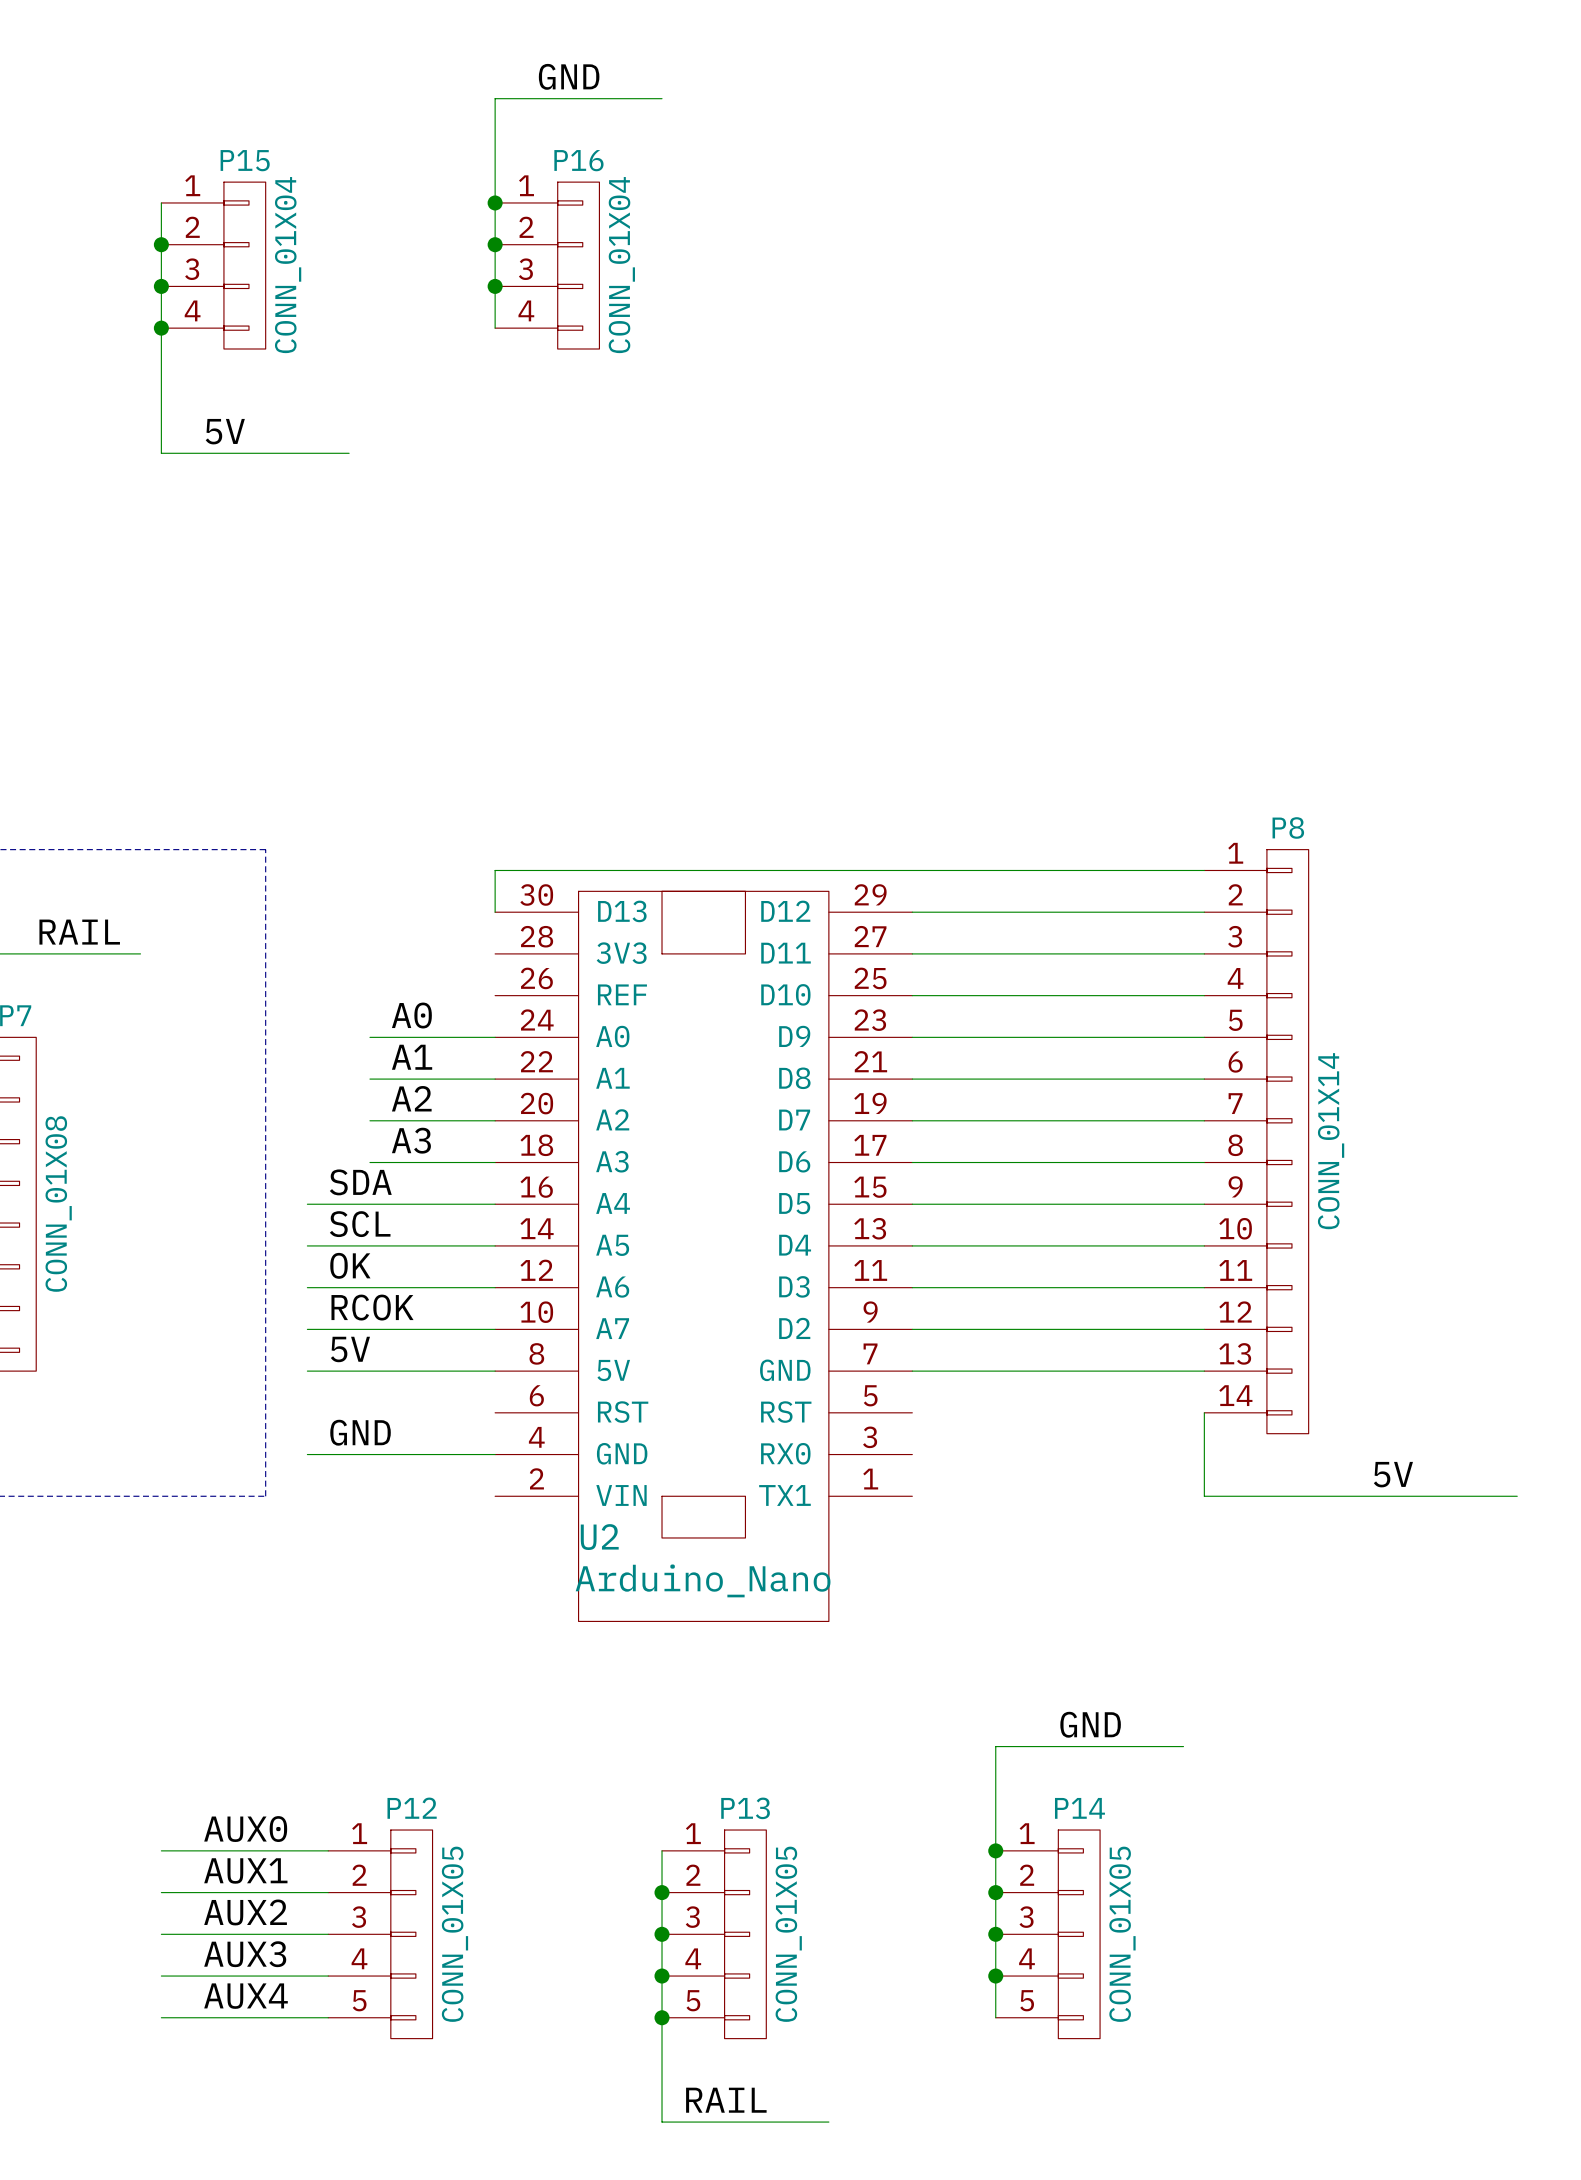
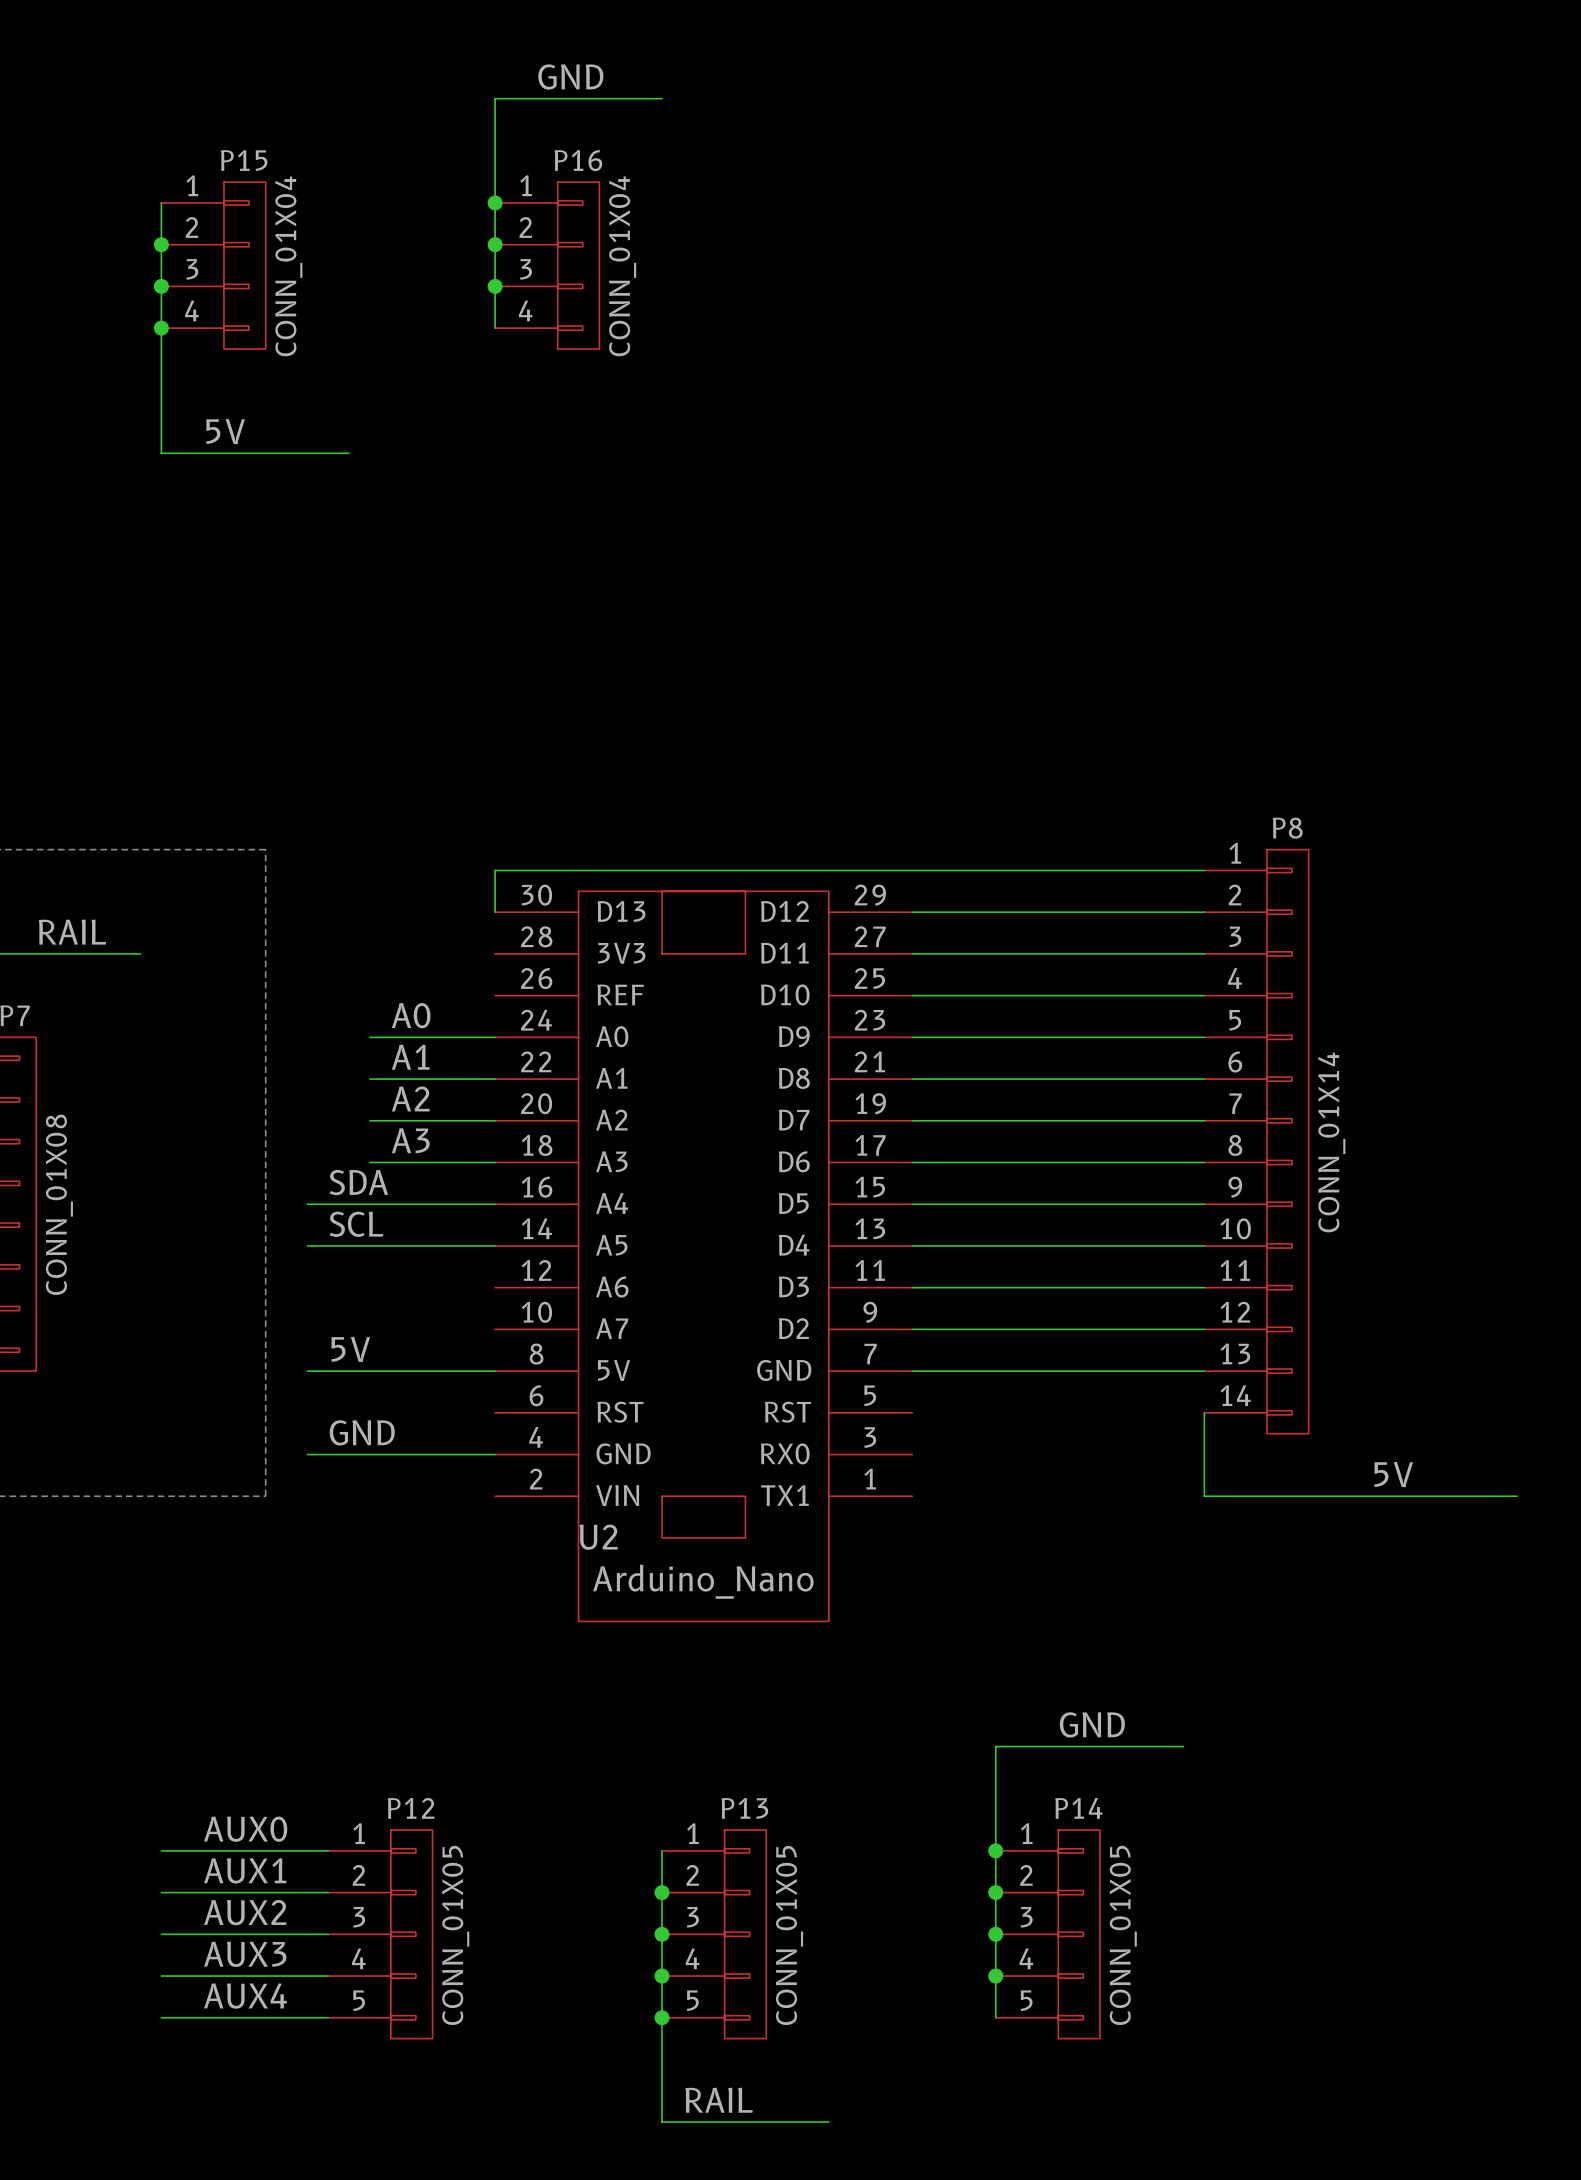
label: OK (350, 1265) -> none
wire: (307, 1287) (495, 1287) -> none
label: RCOK (372, 1307) -> none
wire: (307, 1329) (495, 1329) -> none

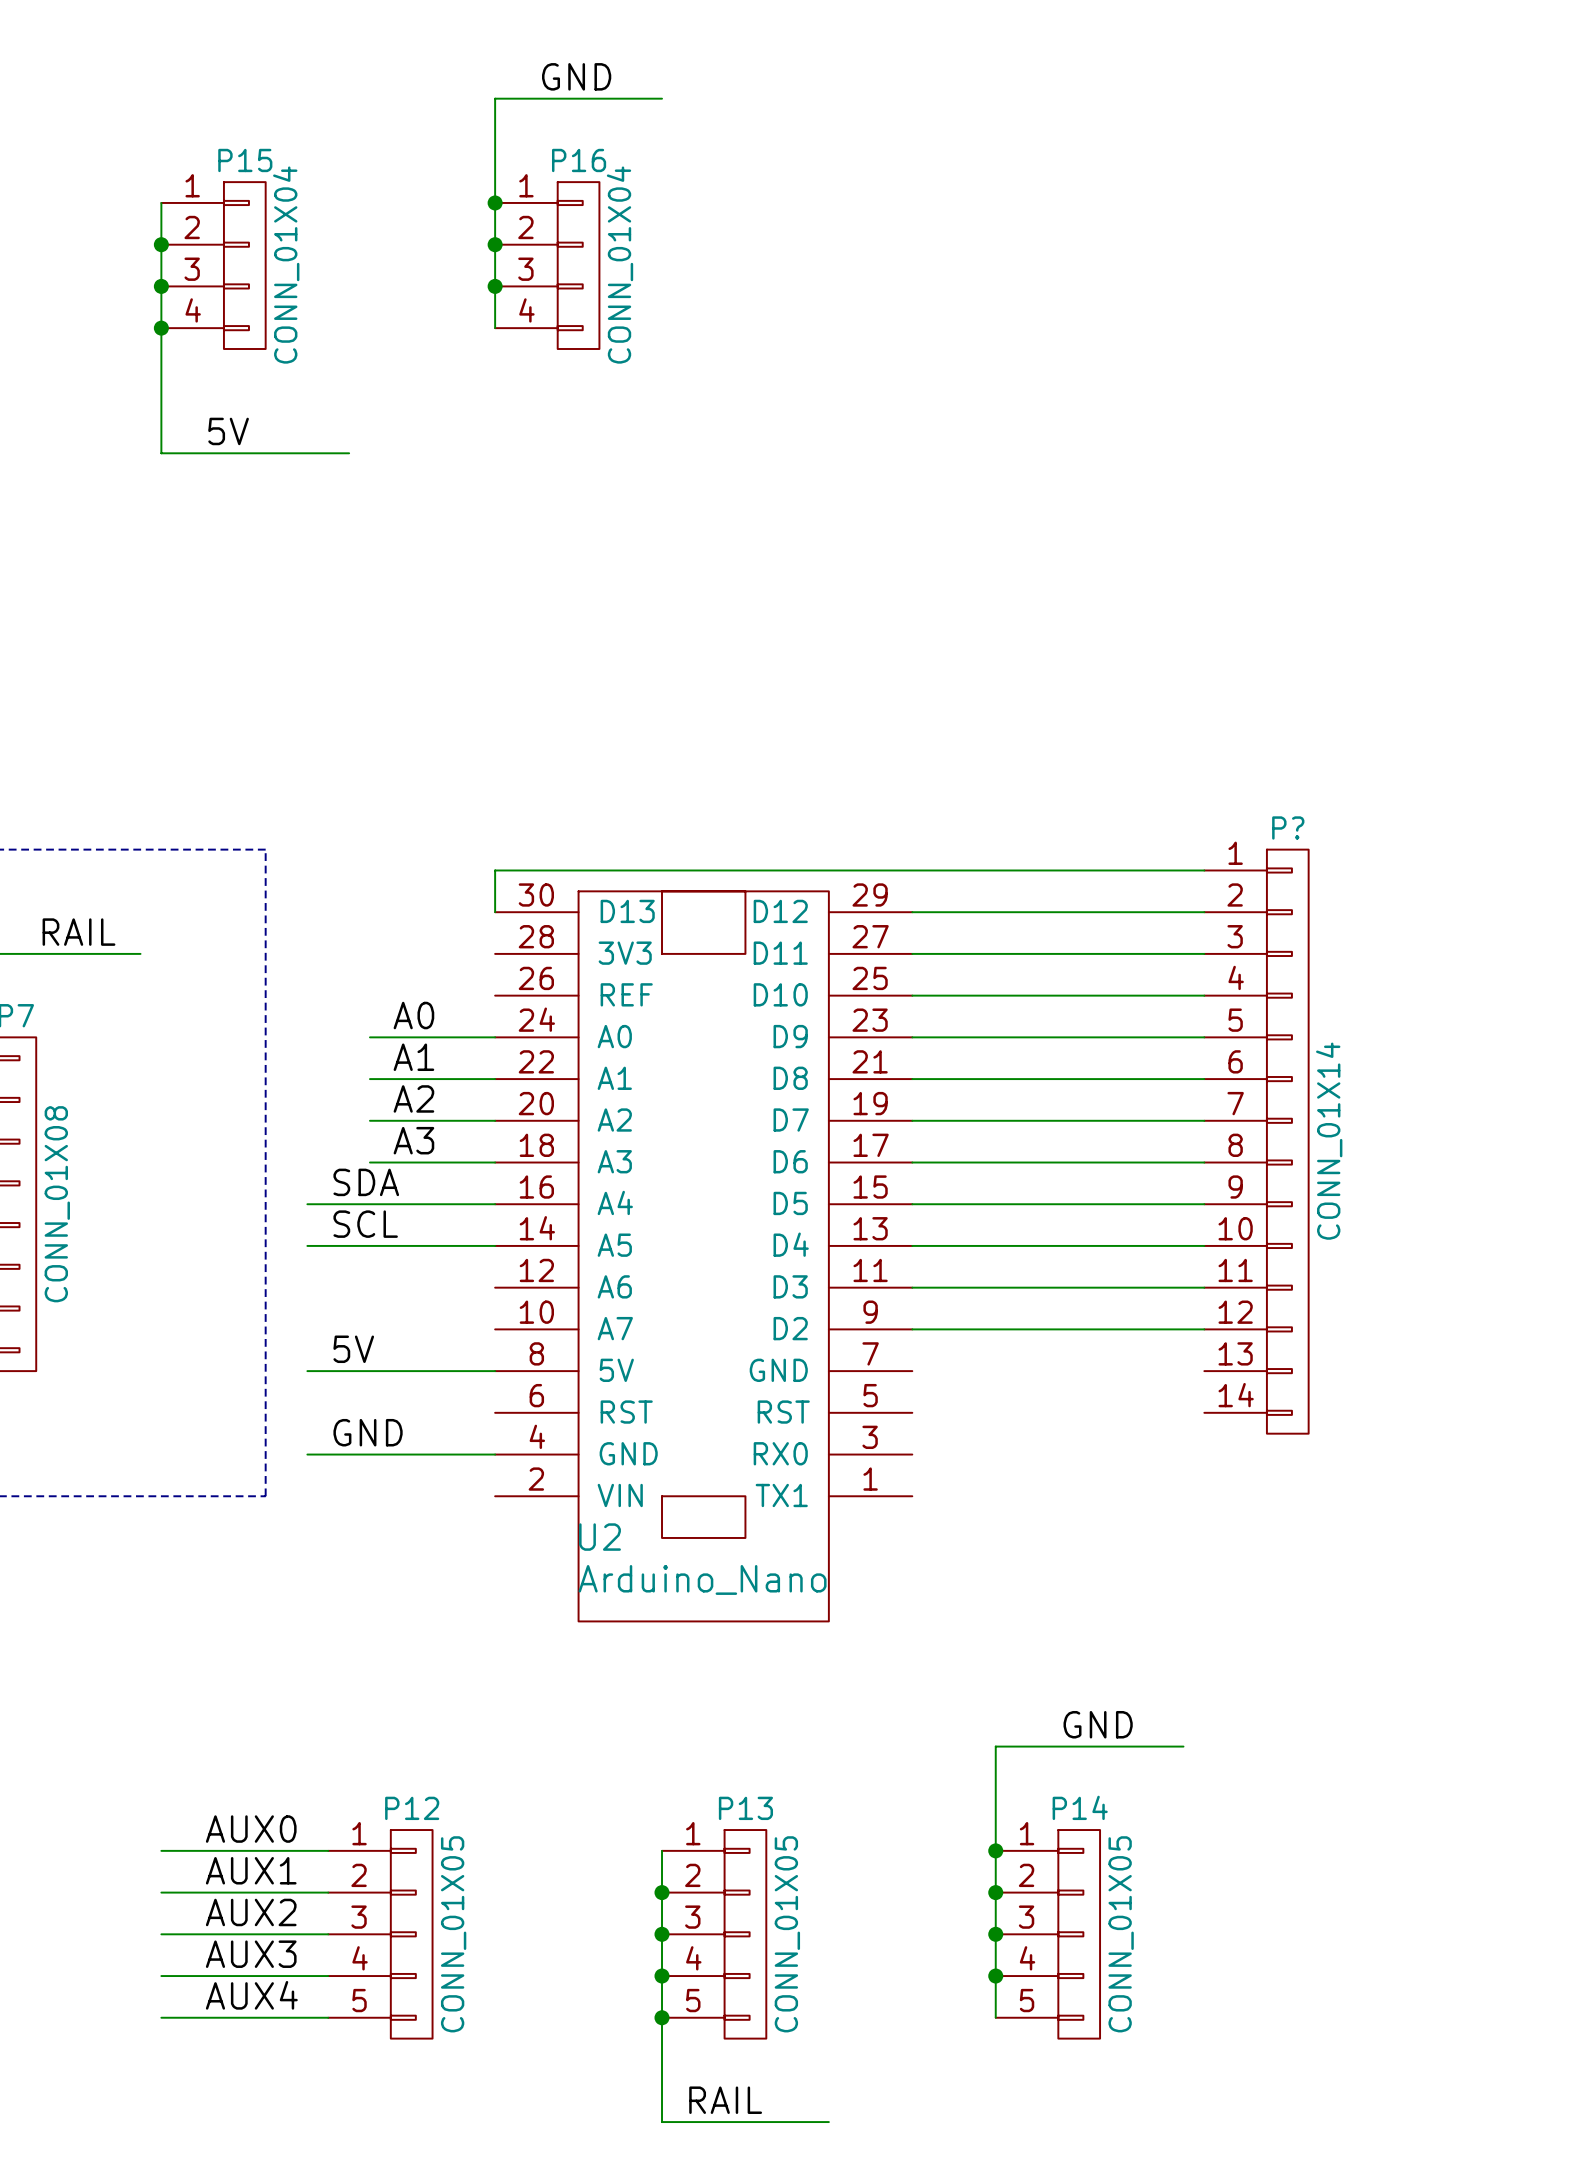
P8 name: P8 (1287, 828) -> P? (1288, 827)
wire: (912, 1371) (1204, 1371) -> none
wire: (1204, 1412) (1204, 1496) (1517, 1496) -> none
label: 5V (1393, 1474) -> none

